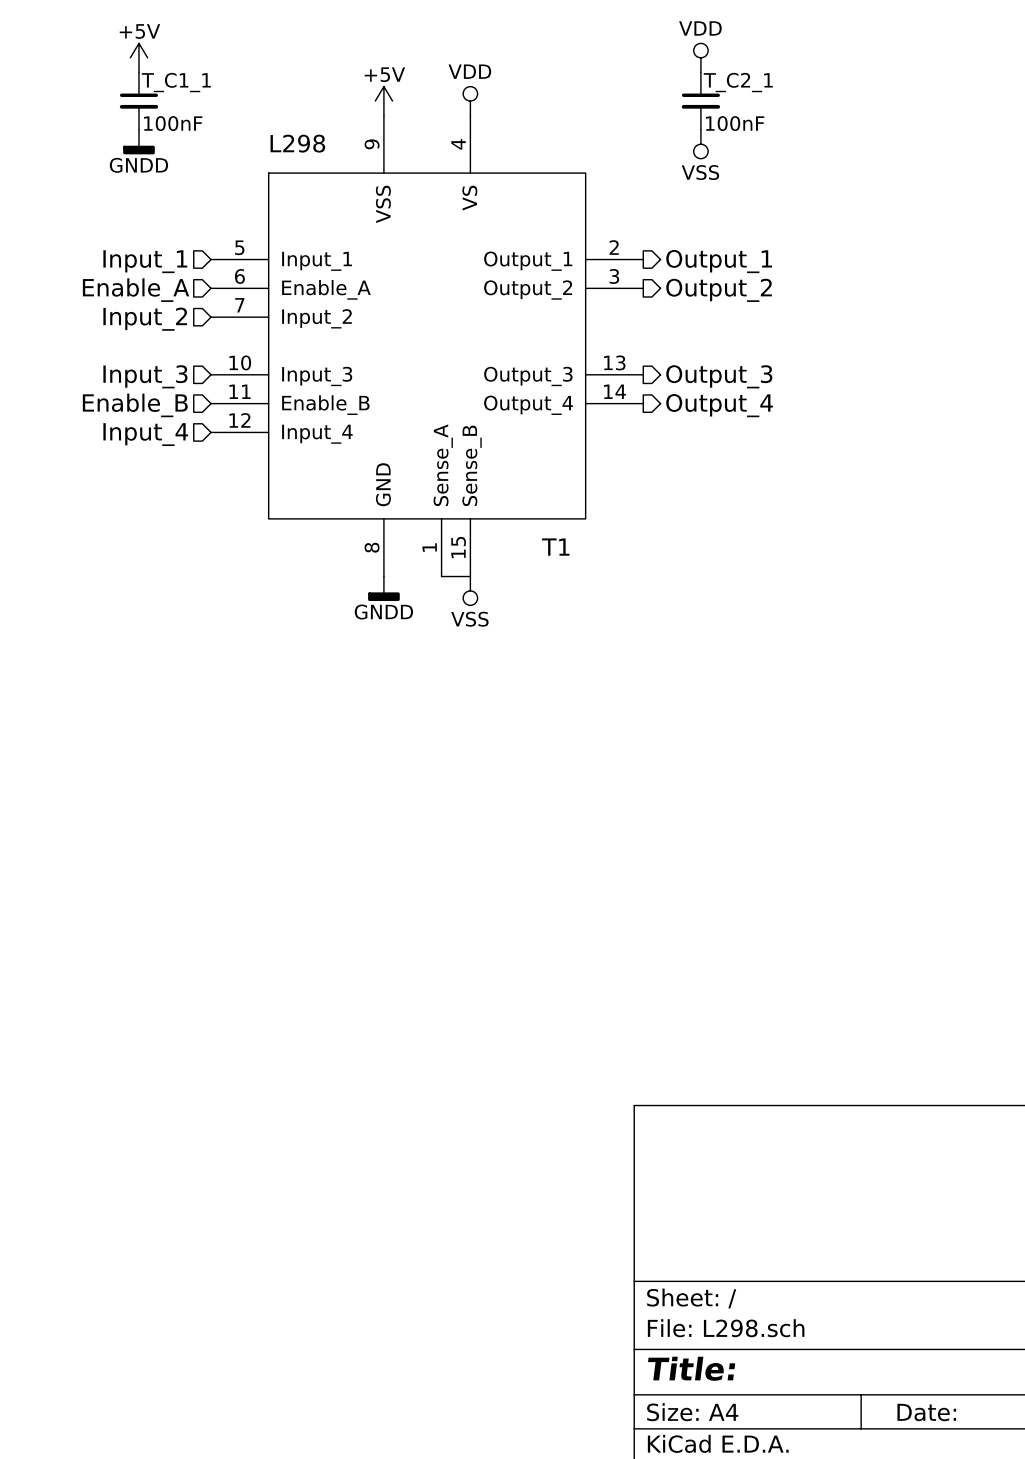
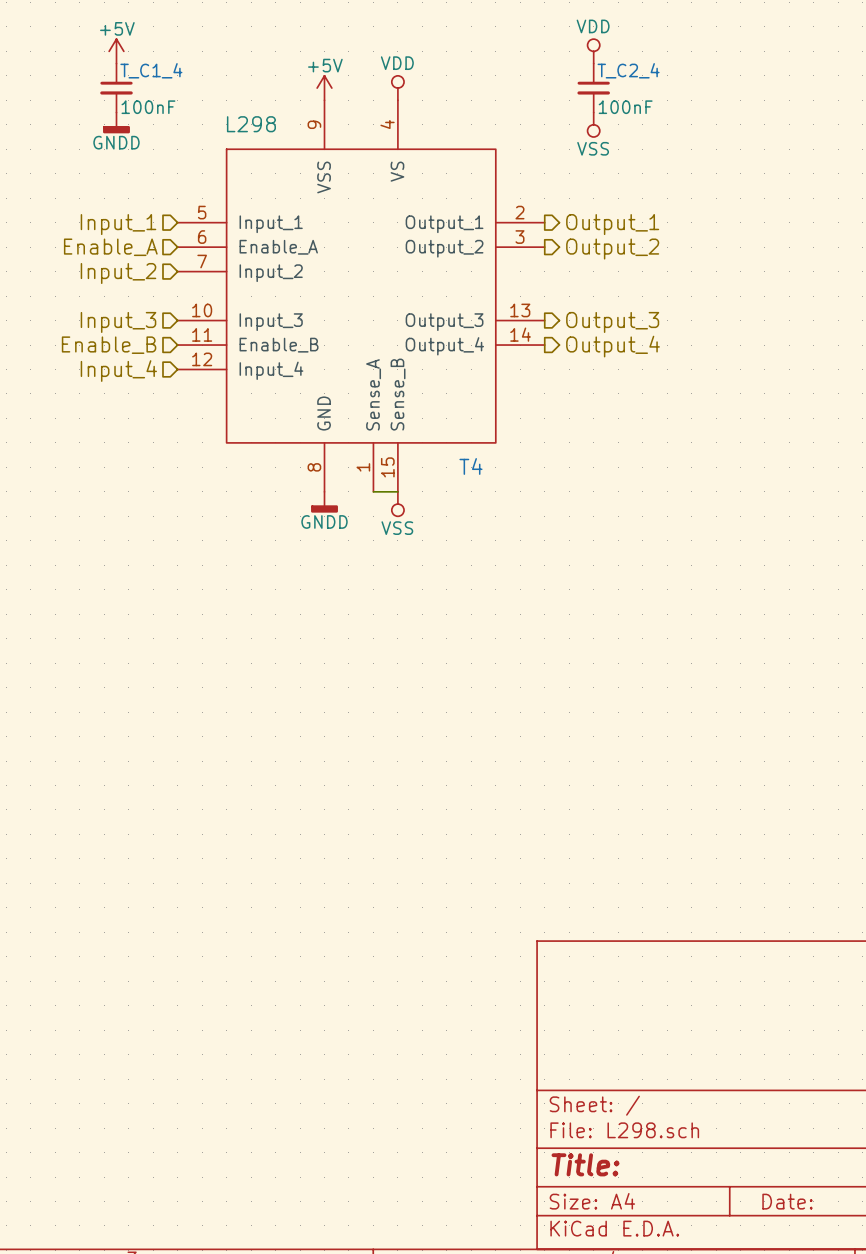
T_C1_1 name: T_C1_1 (176, 82) -> T_C1_4 (151, 70)
T_C2_1 name: T_C2_1 (738, 82) -> T_C2_4 (628, 70)
T1 name: T1 (555, 547) -> T4 (470, 466)

